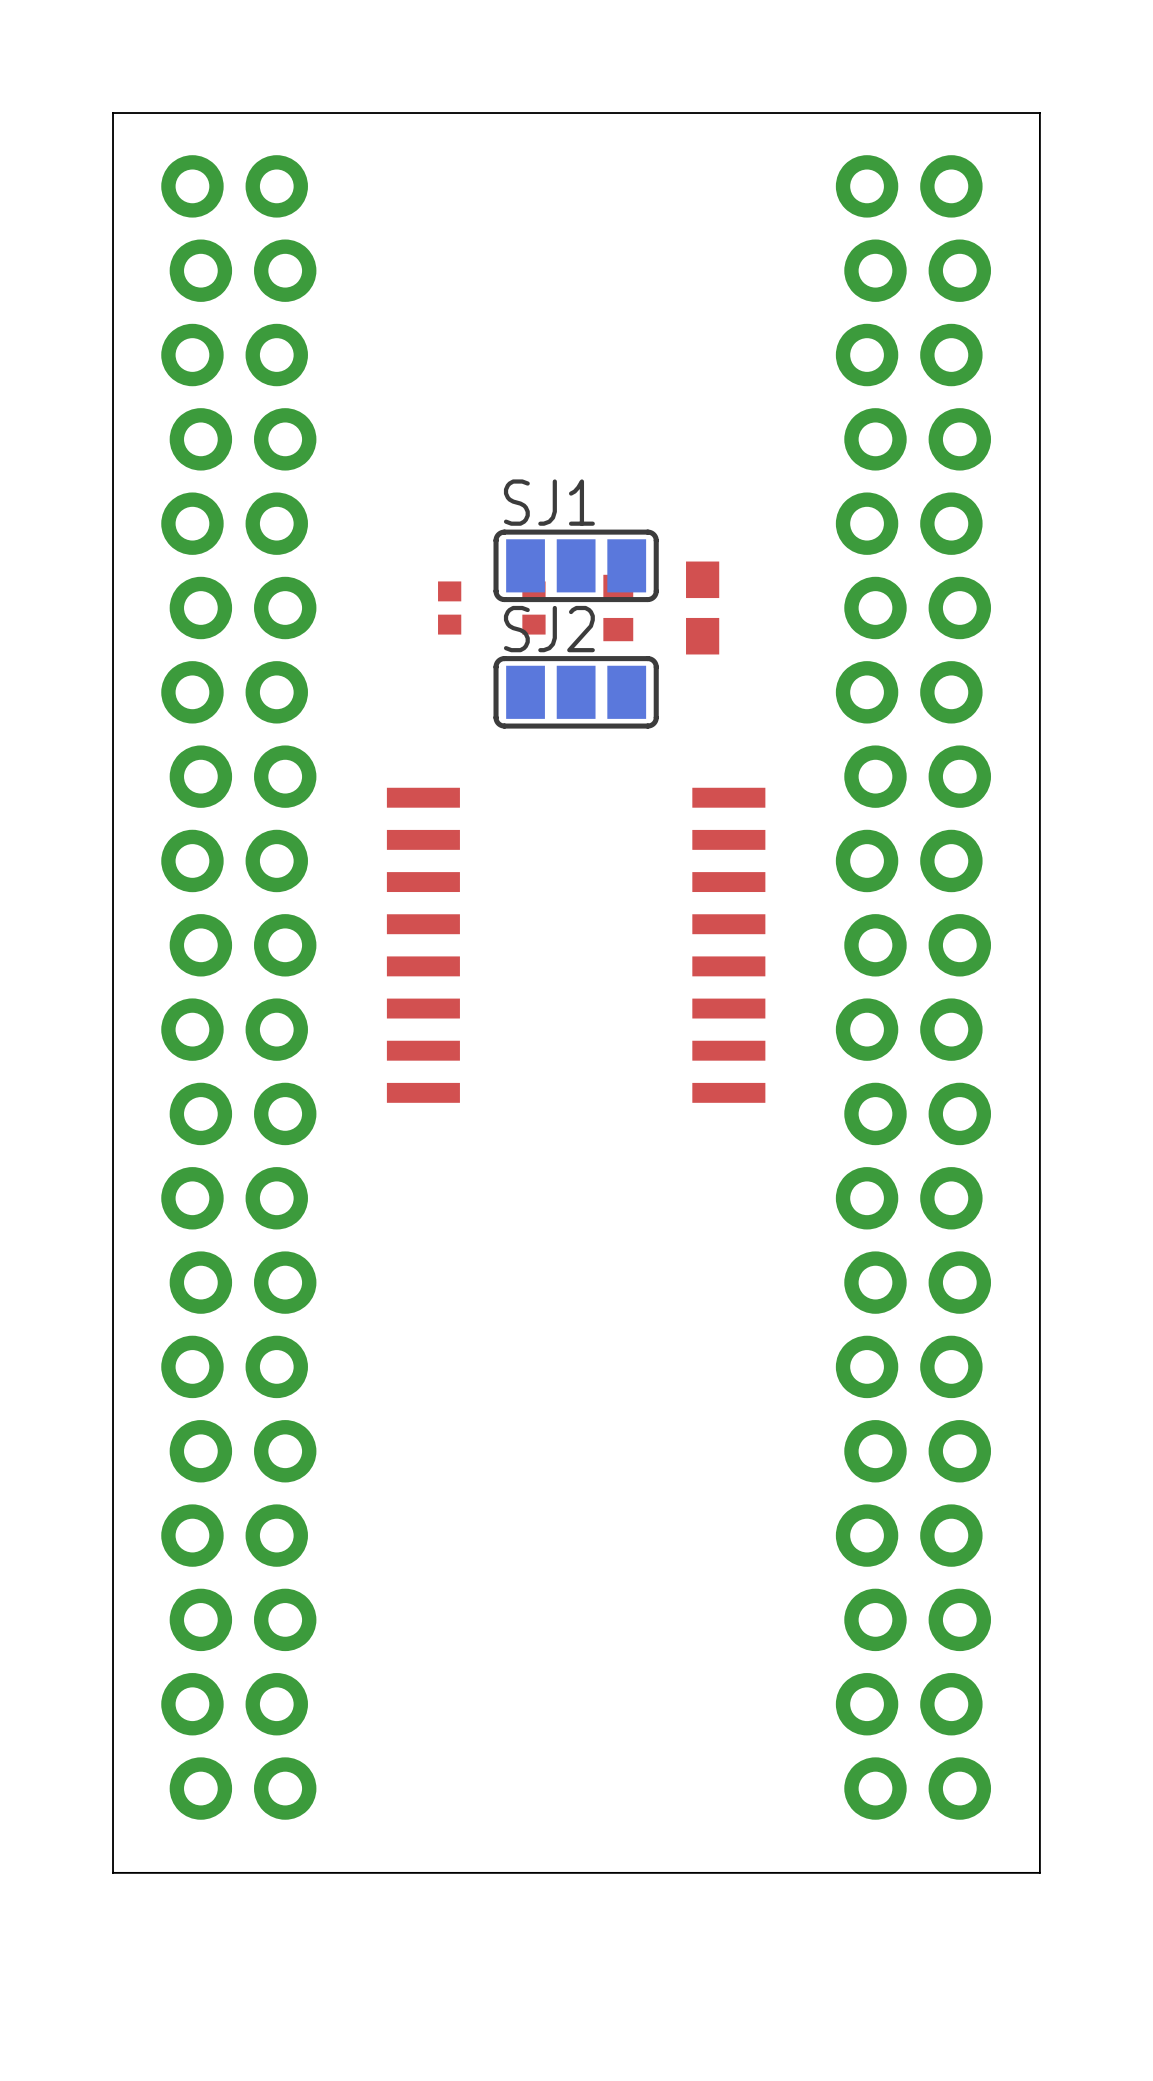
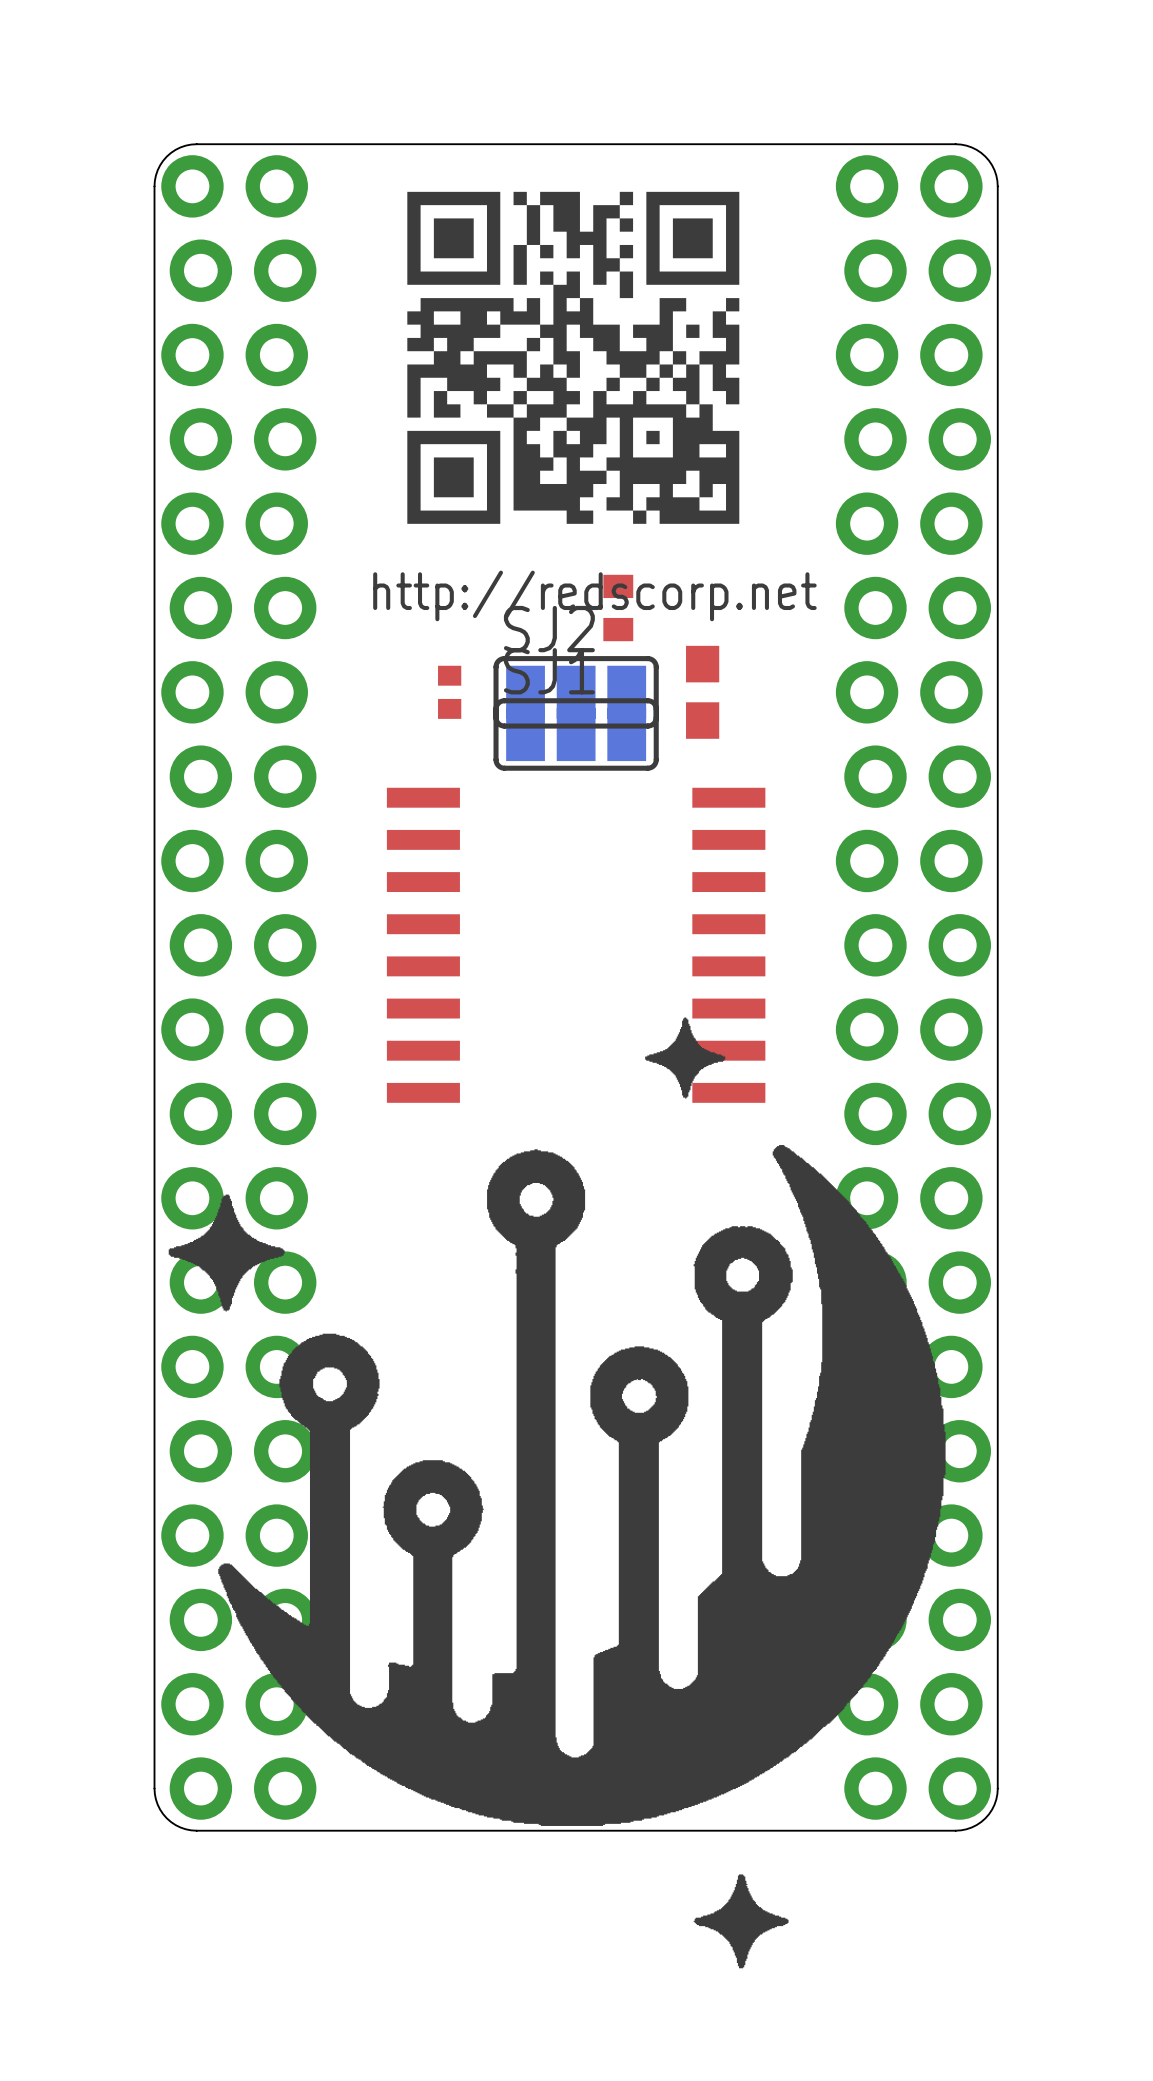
board edge: (1039, 113) (113, 113) (113, 1872) (1039, 1872) (1039, 113) -> (955, 144) (971, 147) (985, 156) (994, 170) (997, 186) (997, 1788) (994, 1804) (989, 1814) (976, 1825) (955, 1830) (196, 1830) (180, 1827) (171, 1822) (160, 1809) (154, 1788) (154, 186) (157, 170) (163, 160) (175, 149) (196, 144) (955, 144)
drawing: none -> [407, 191, 740, 524]
SJ1 position: (576, 565) -> (576, 734)
text: none -> http://redscorp.net (594, 595)
part: (449, 608) -> none
part: (533, 608) -> none
part position: (702, 608) -> (702, 692)
part: none -> (449, 692)
drawing: none -> [168, 1017, 946, 1969]

